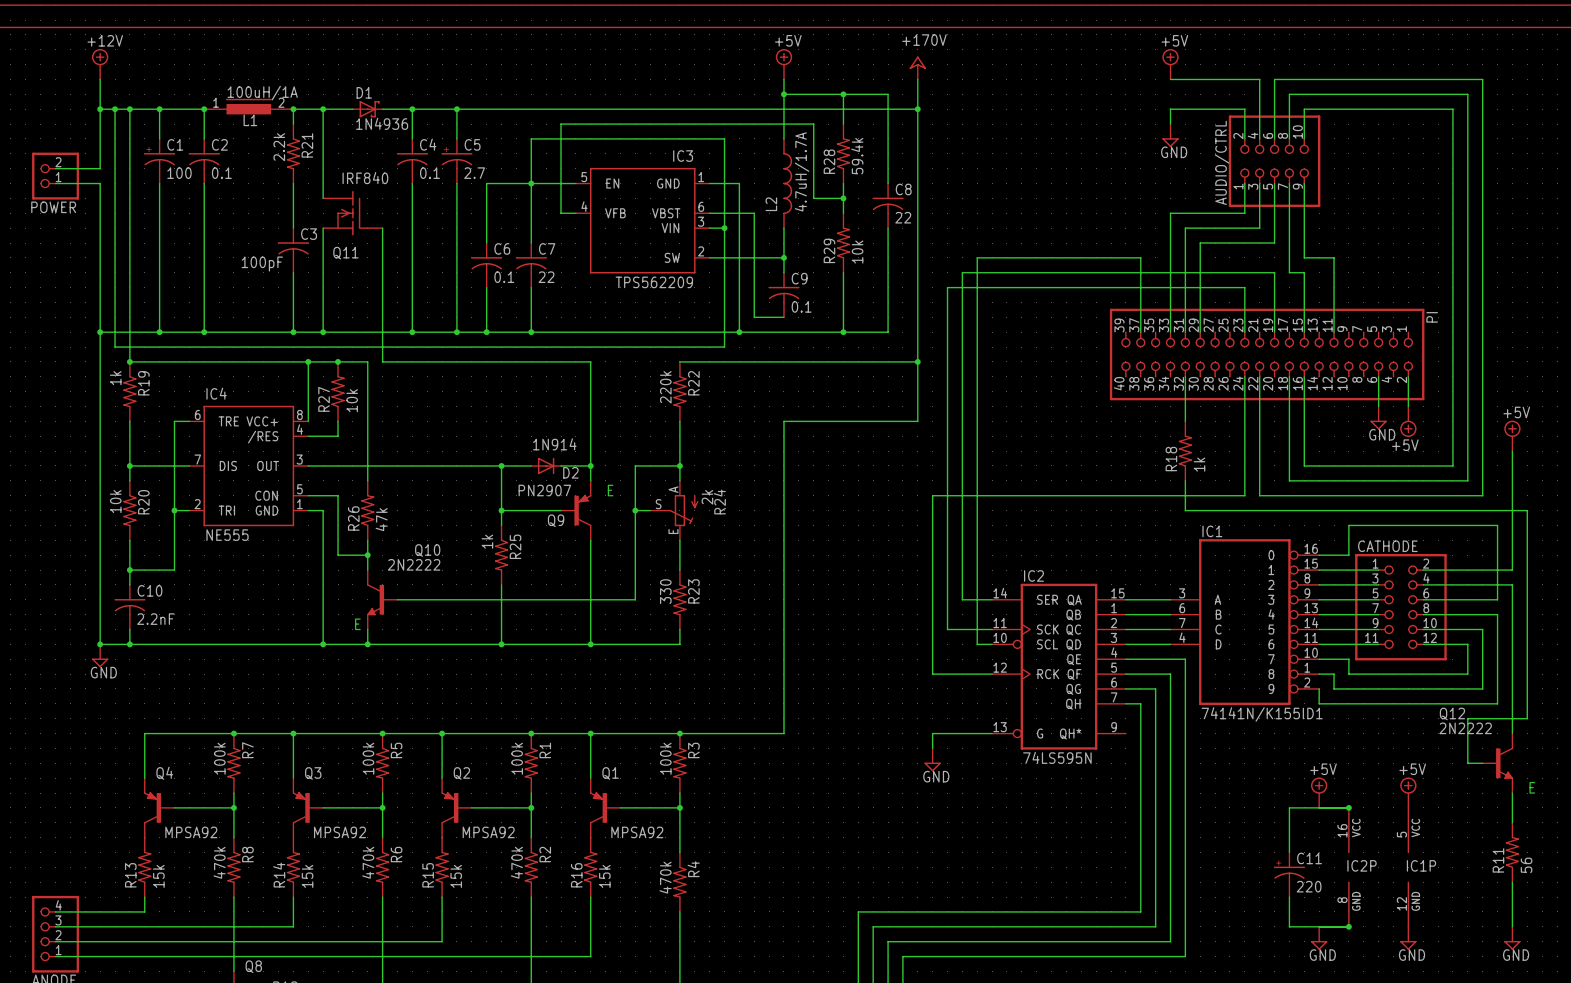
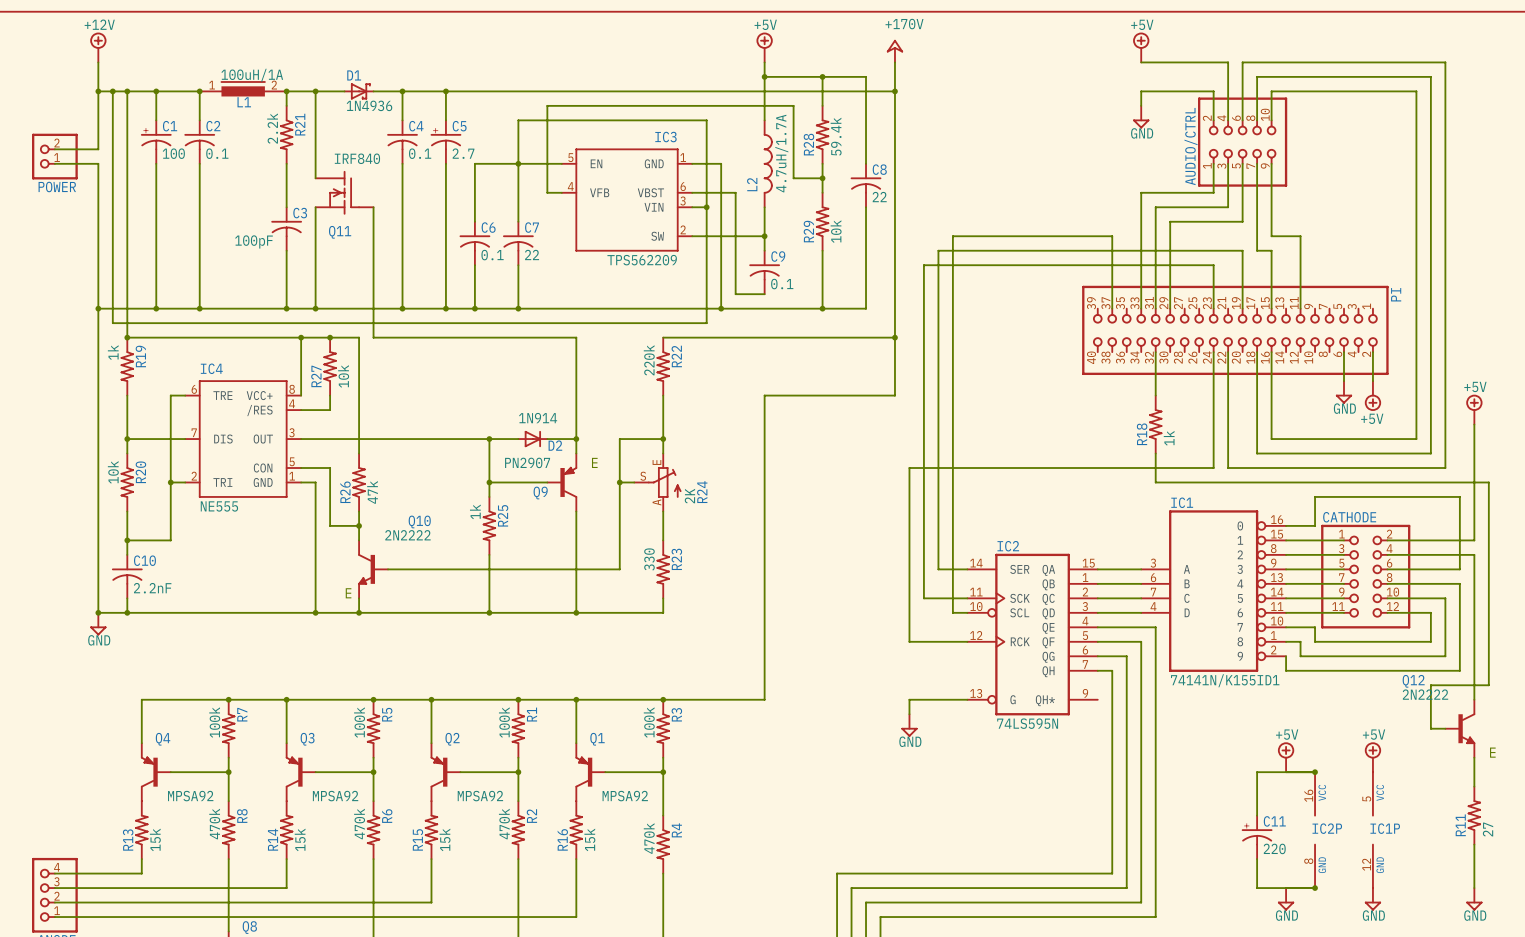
R24 value: 2k (707, 497) -> 2K (689, 496)
R24 flip: as is (681, 510) -> up-down (664, 482)
R11 value: 56 (1526, 865) -> 27 (1488, 829)

